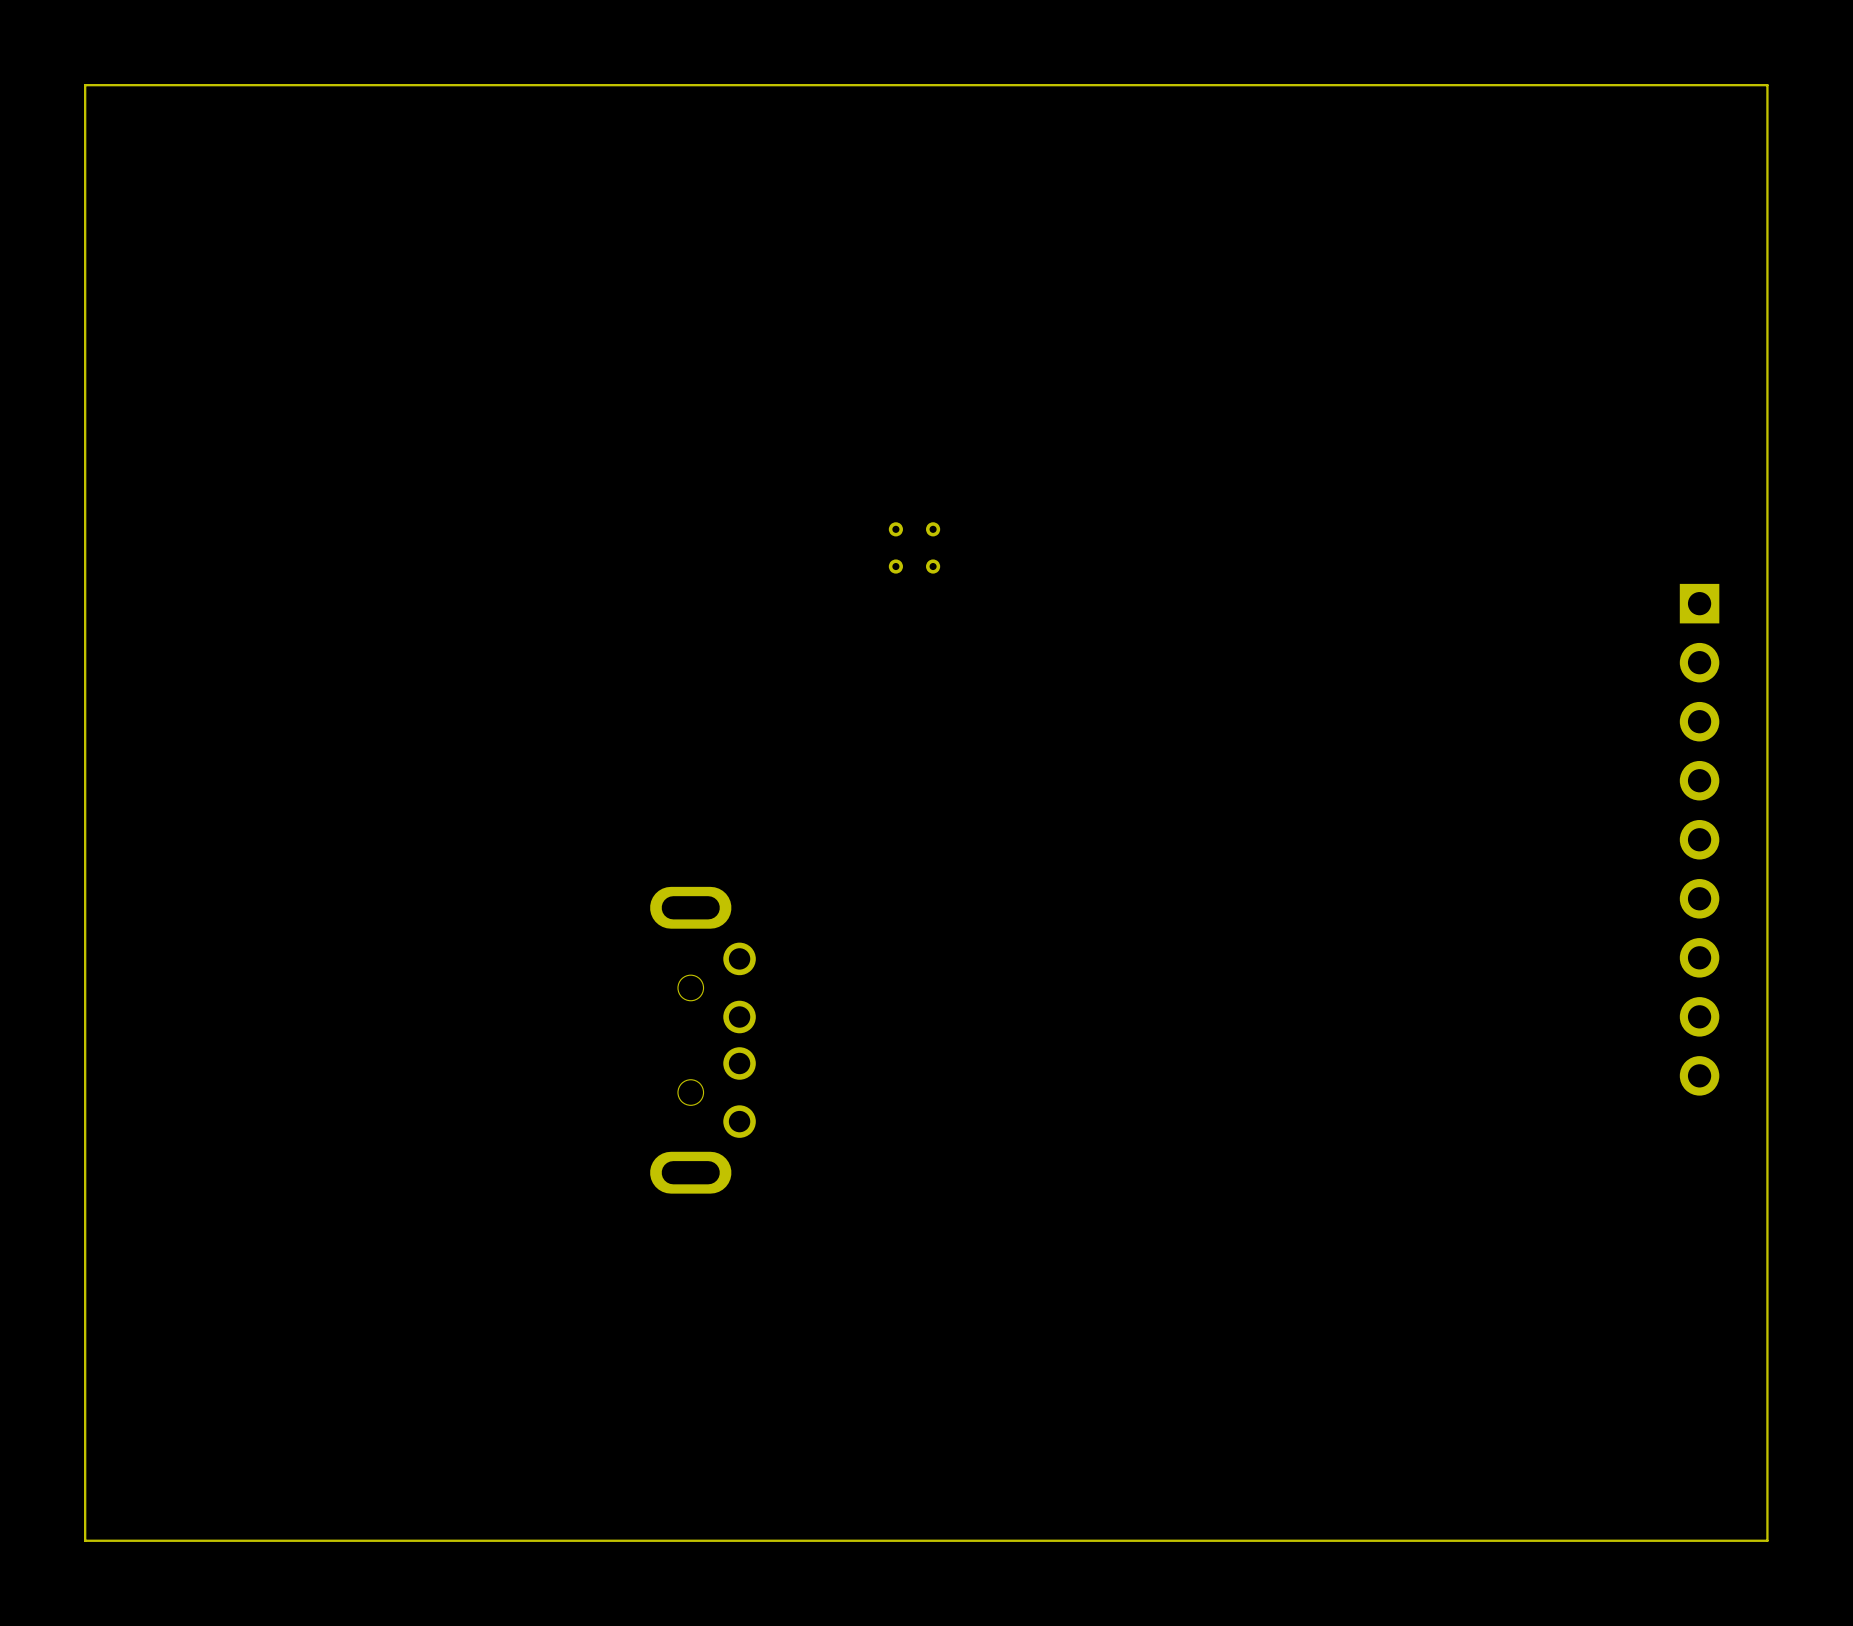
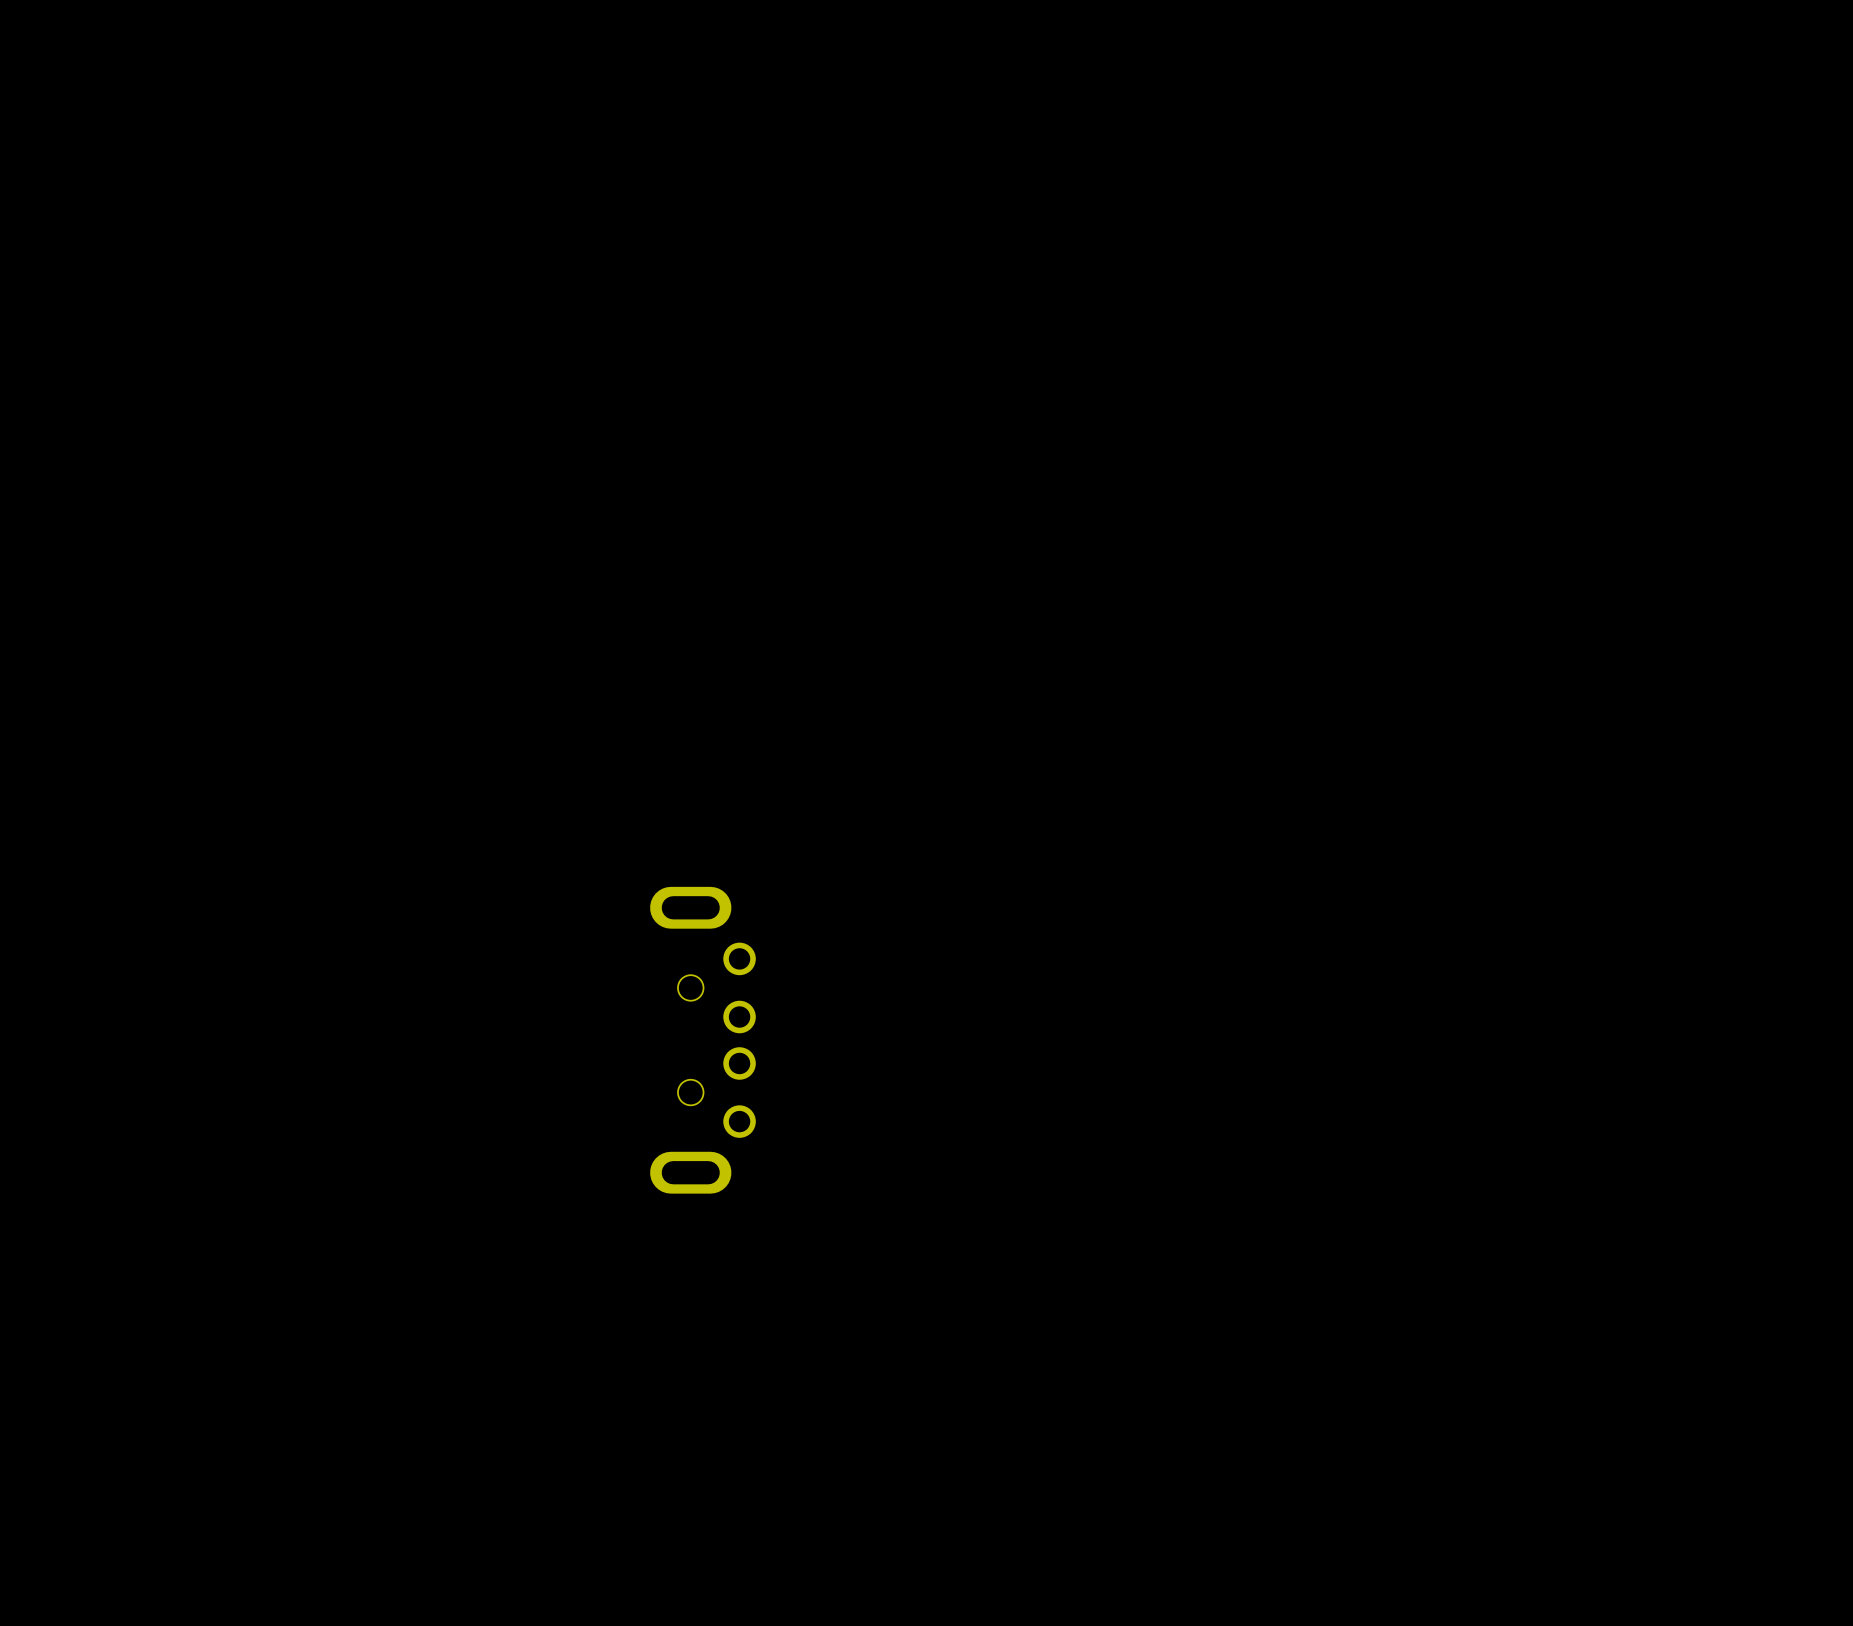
board edge: (1767, 85) (85, 85) (85, 1540) (1767, 1540) (1767, 85) -> none
part: (914, 547) -> none
part: (1699, 839) -> none

